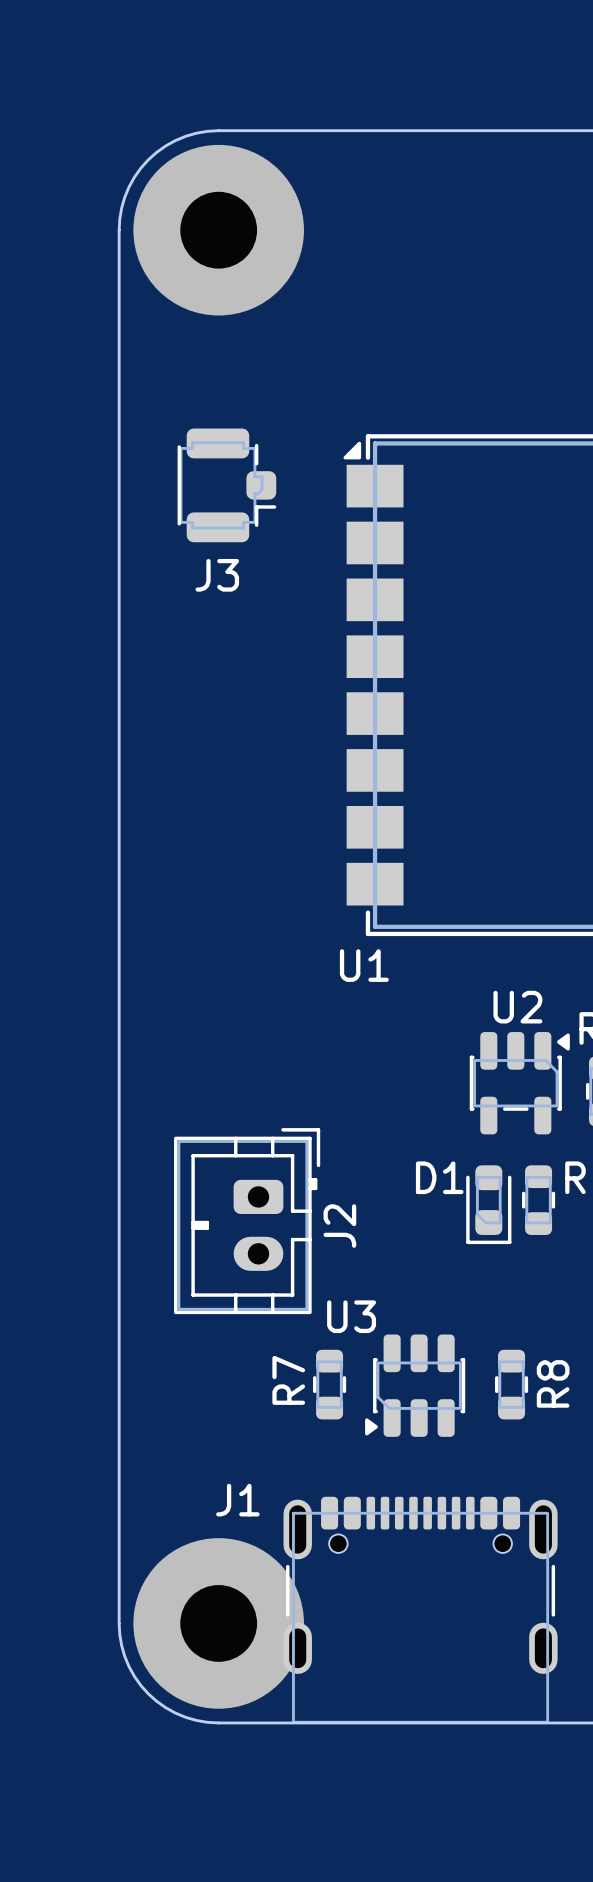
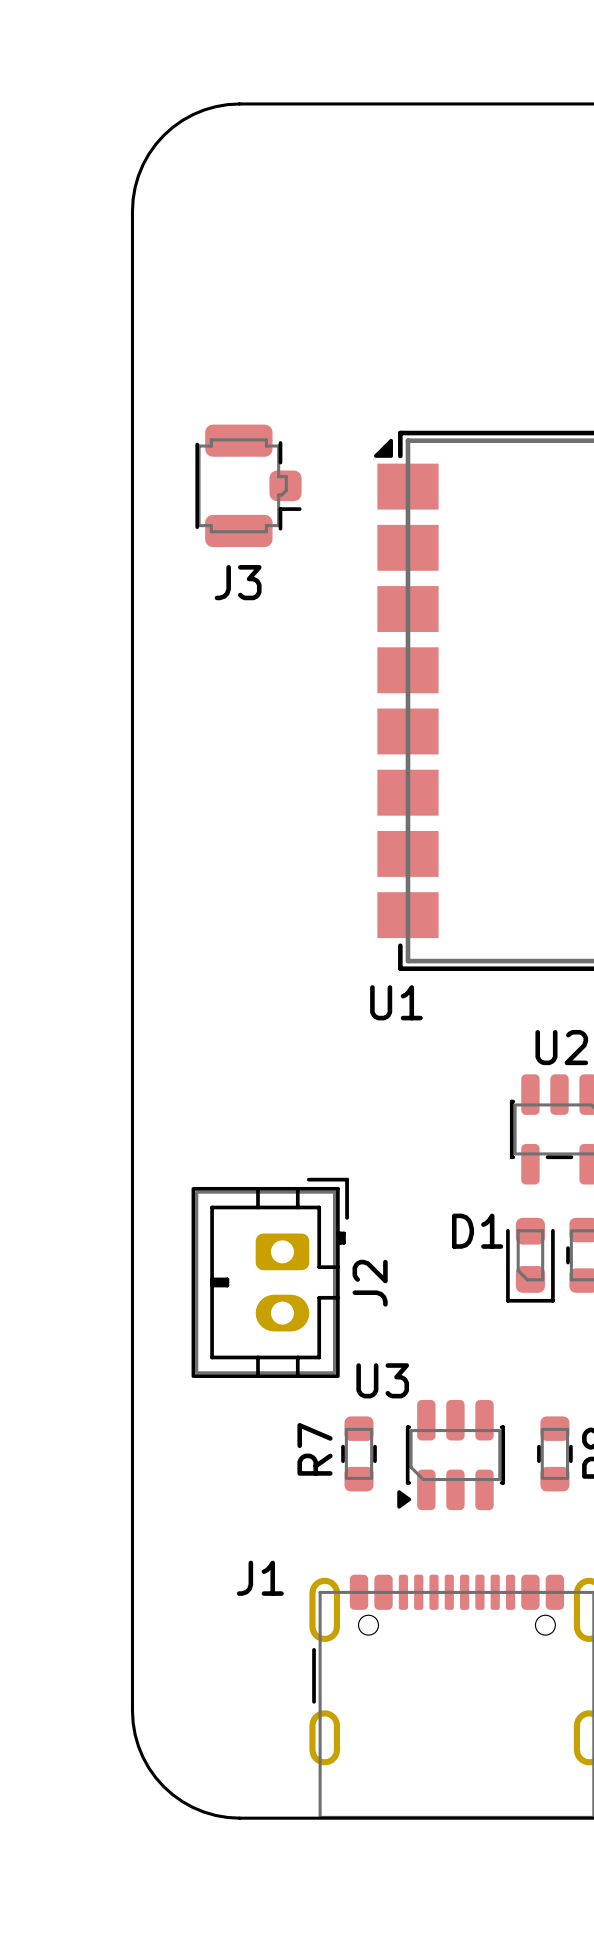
via: (218, 230) -> none
via: (218, 1623) -> none

